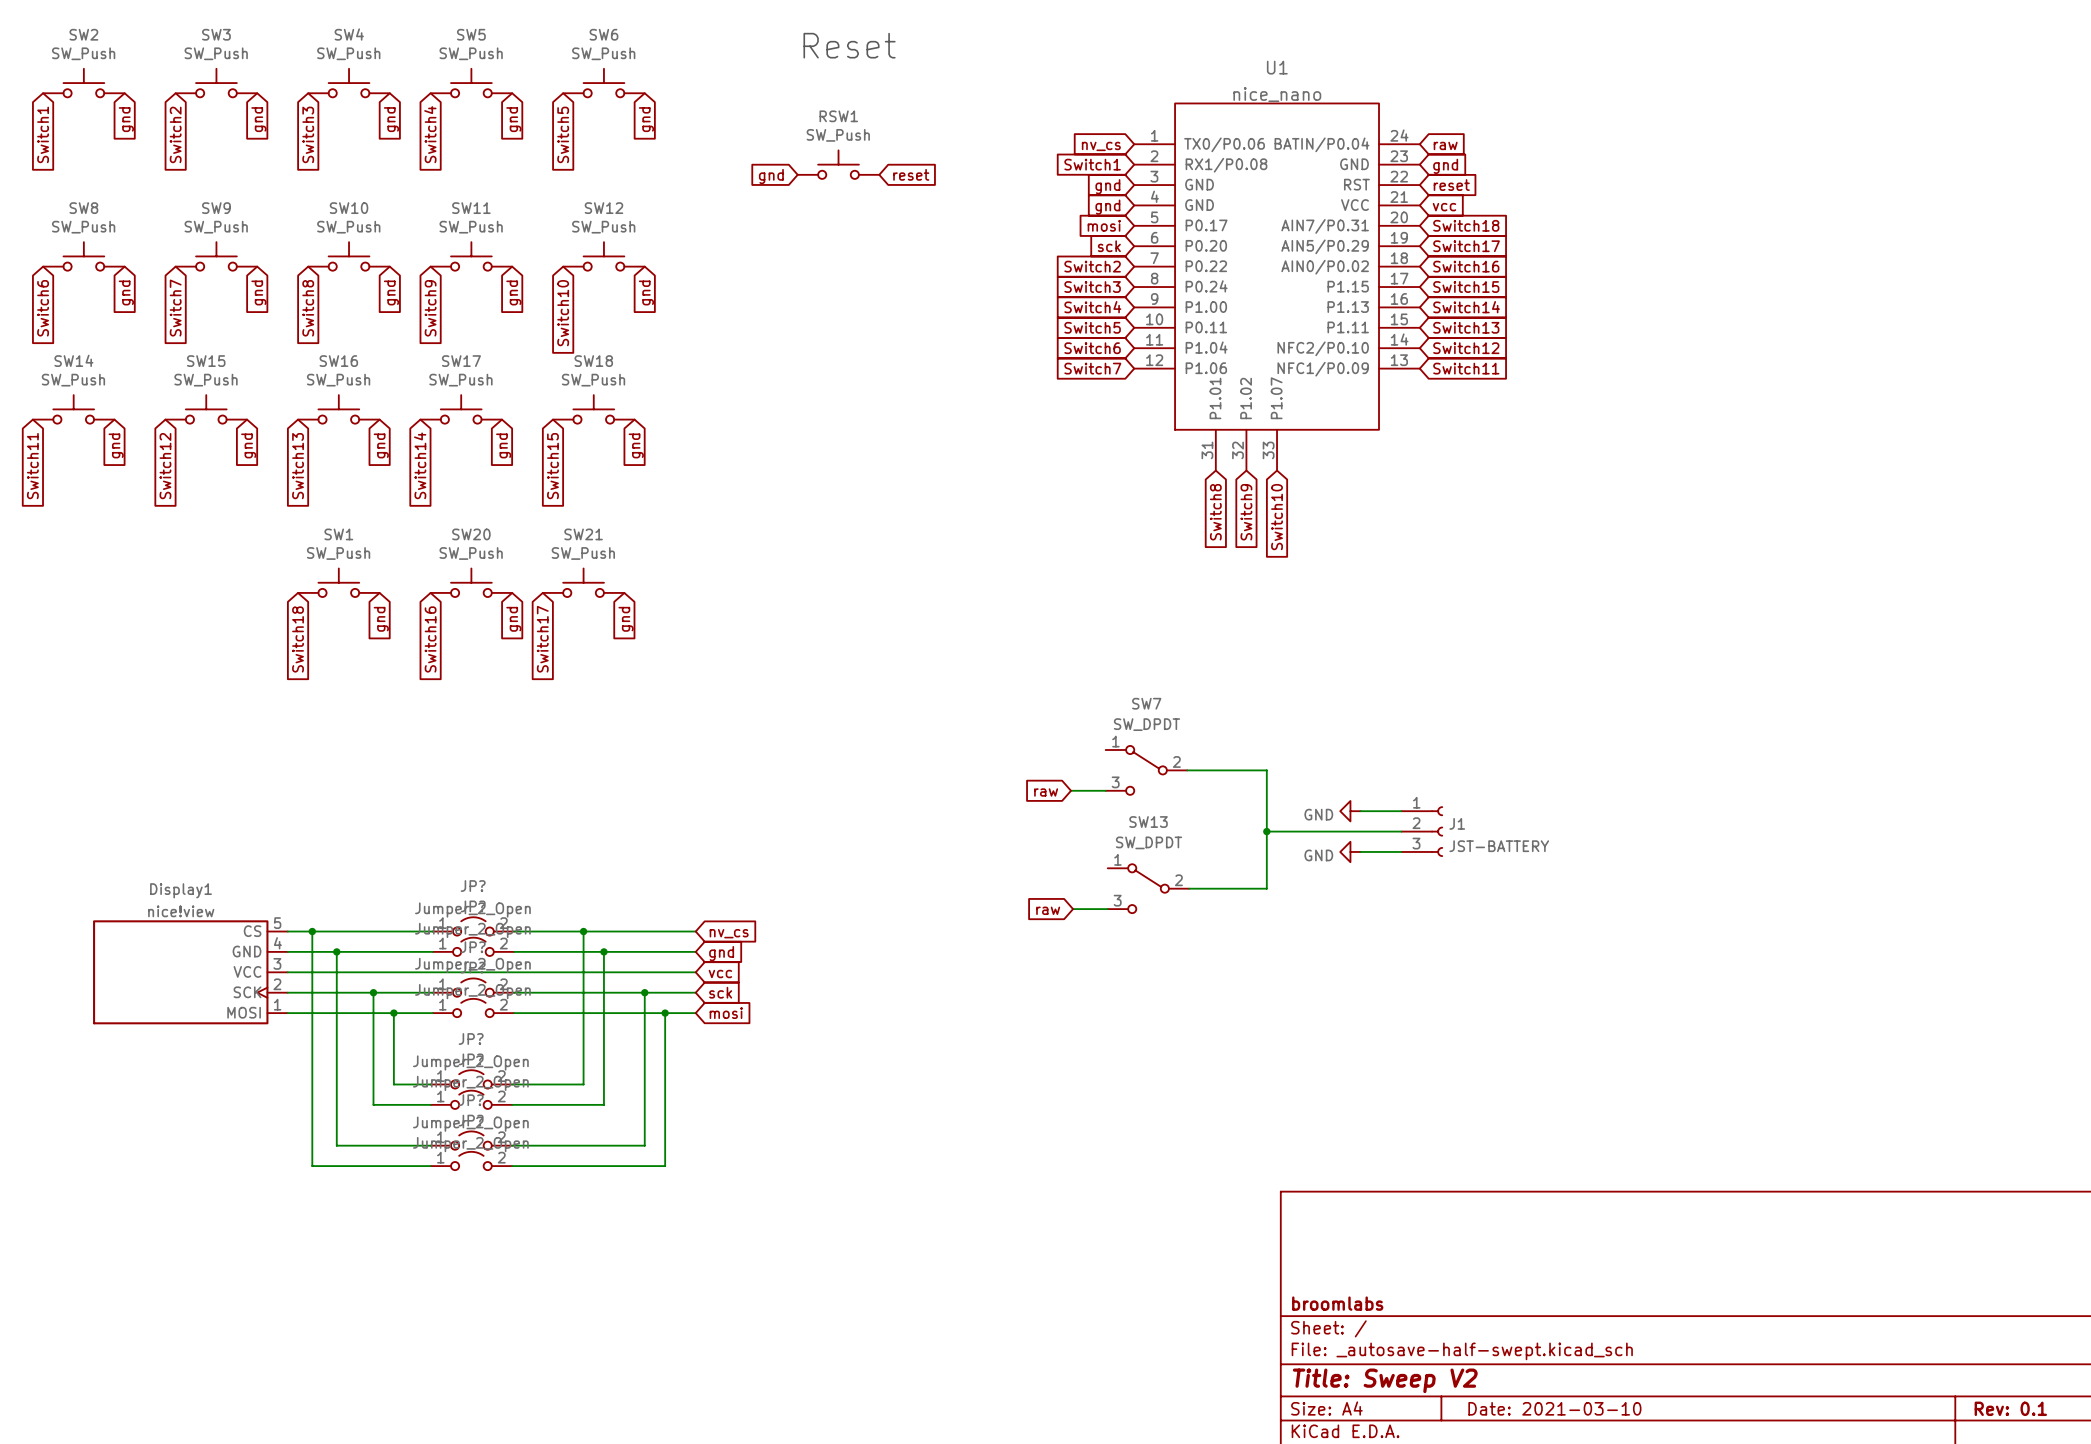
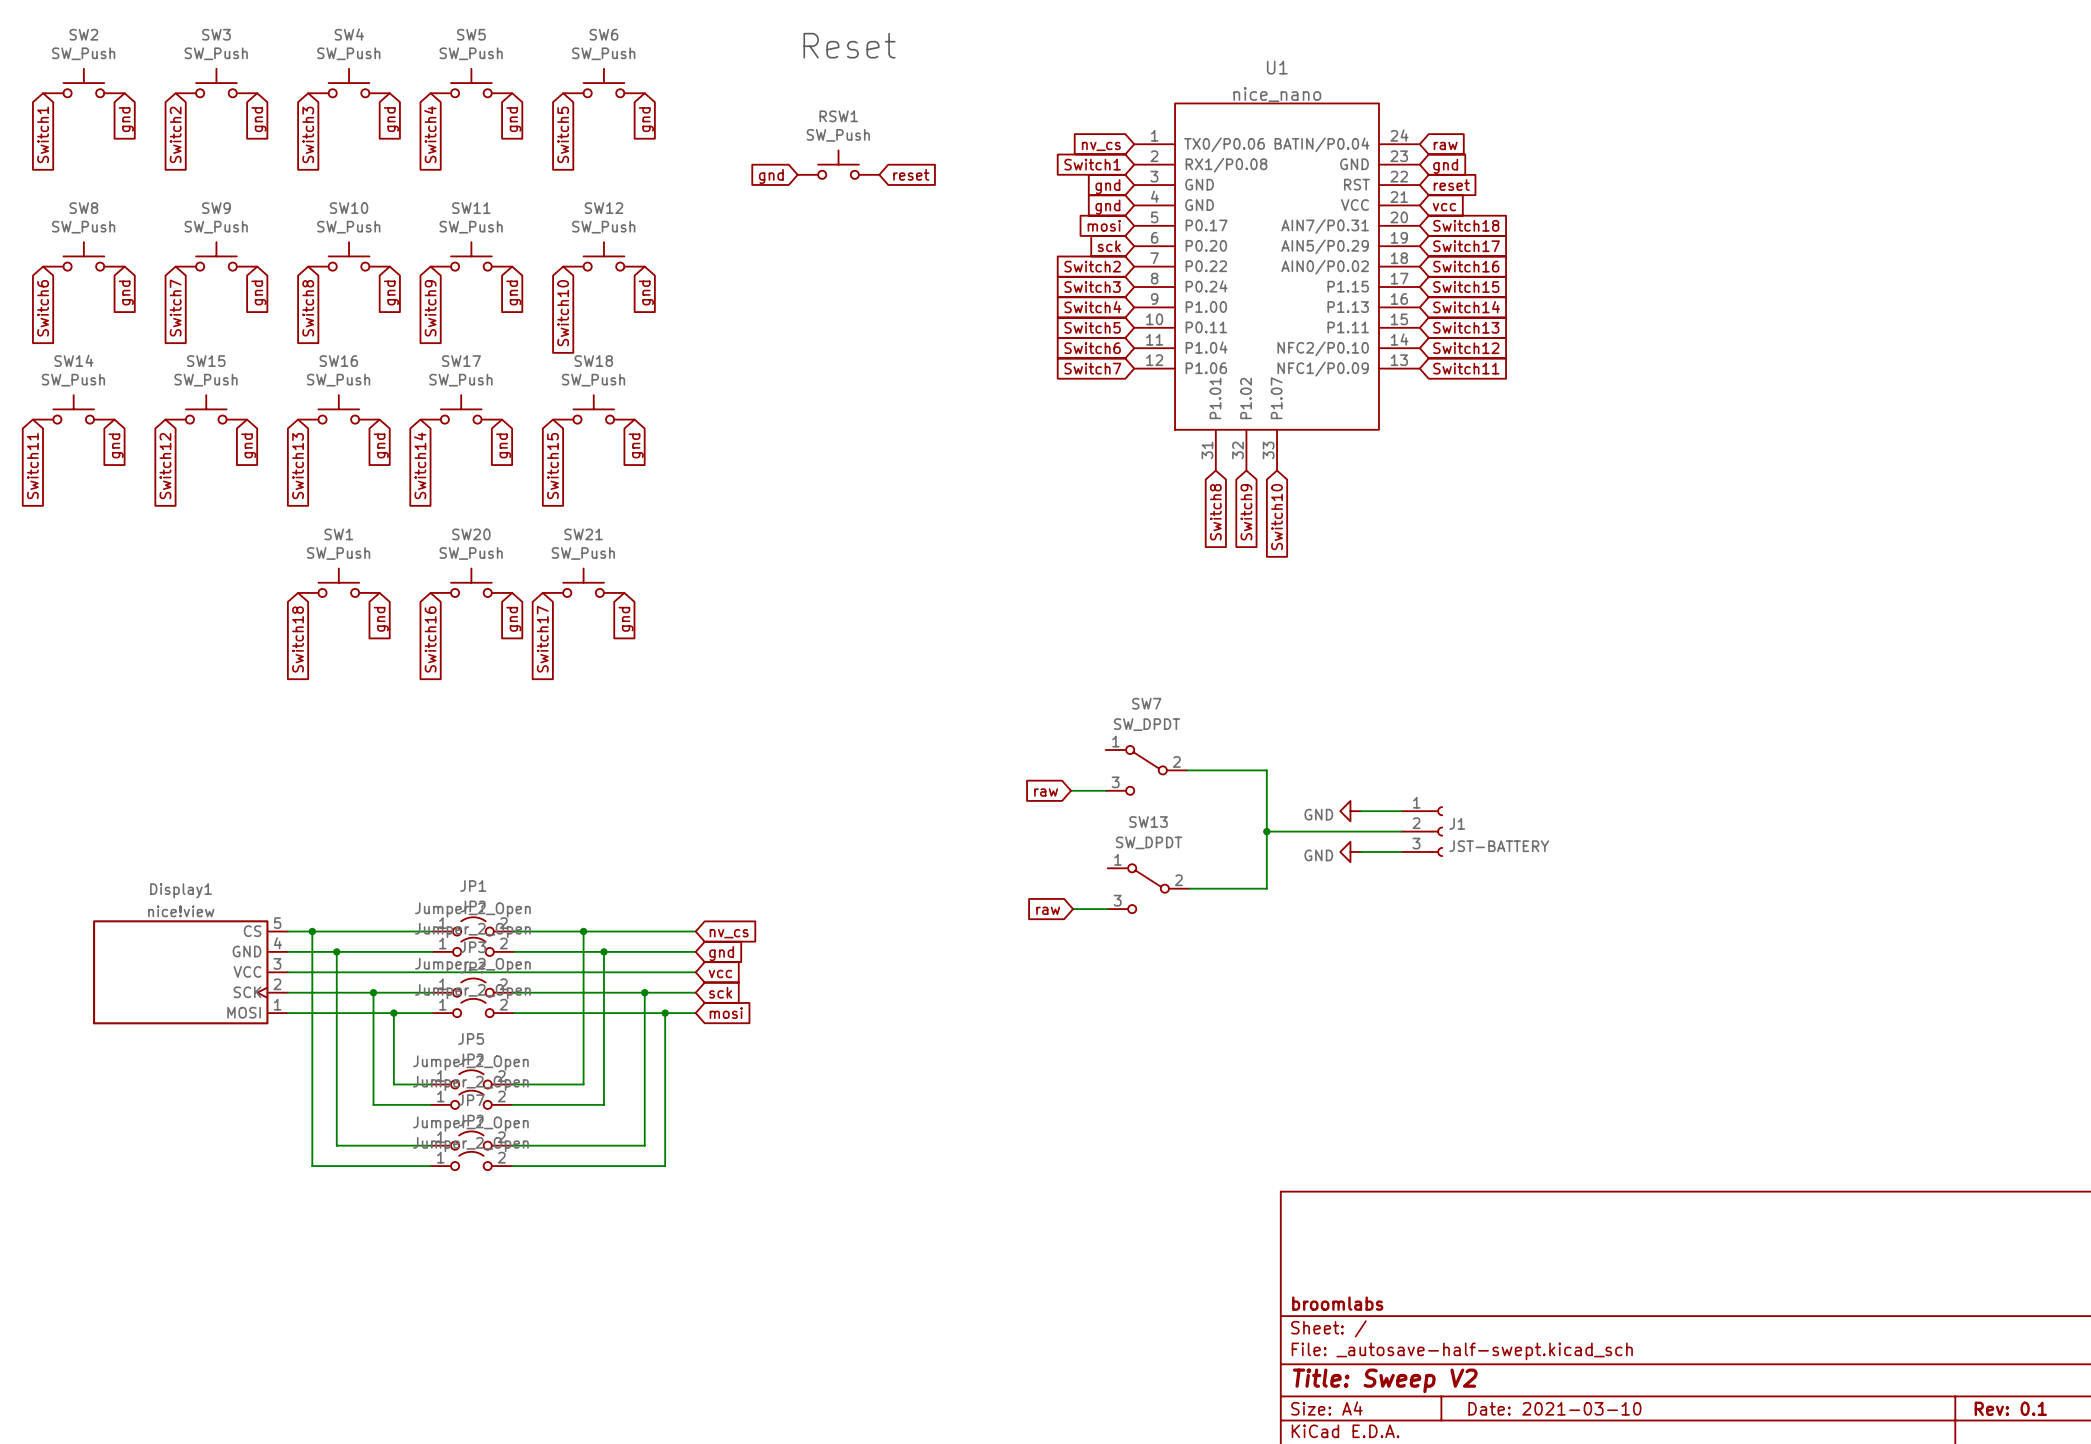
JP? name: JP? (473, 886) -> JP1 (473, 886)
JP? name: JP? (473, 947) -> JP3 (473, 947)
JP? name: JP? (471, 1039) -> JP5 (471, 1039)
JP? name: JP? (471, 1100) -> JP7 (471, 1100)

